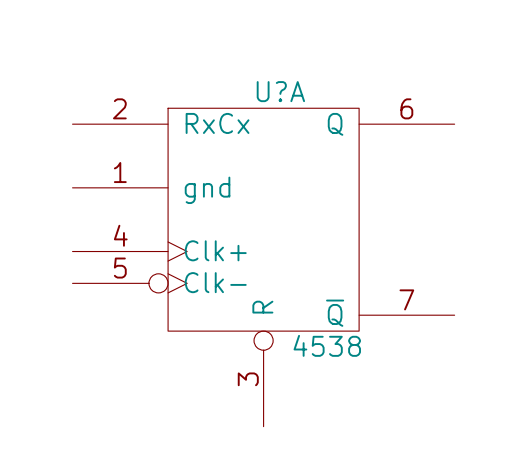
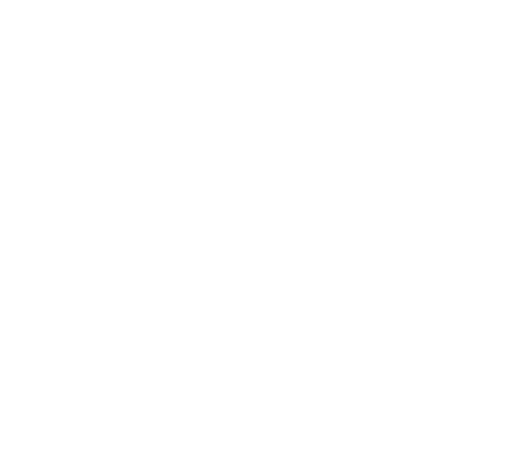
U?A: 4538 (263, 267) -> none

